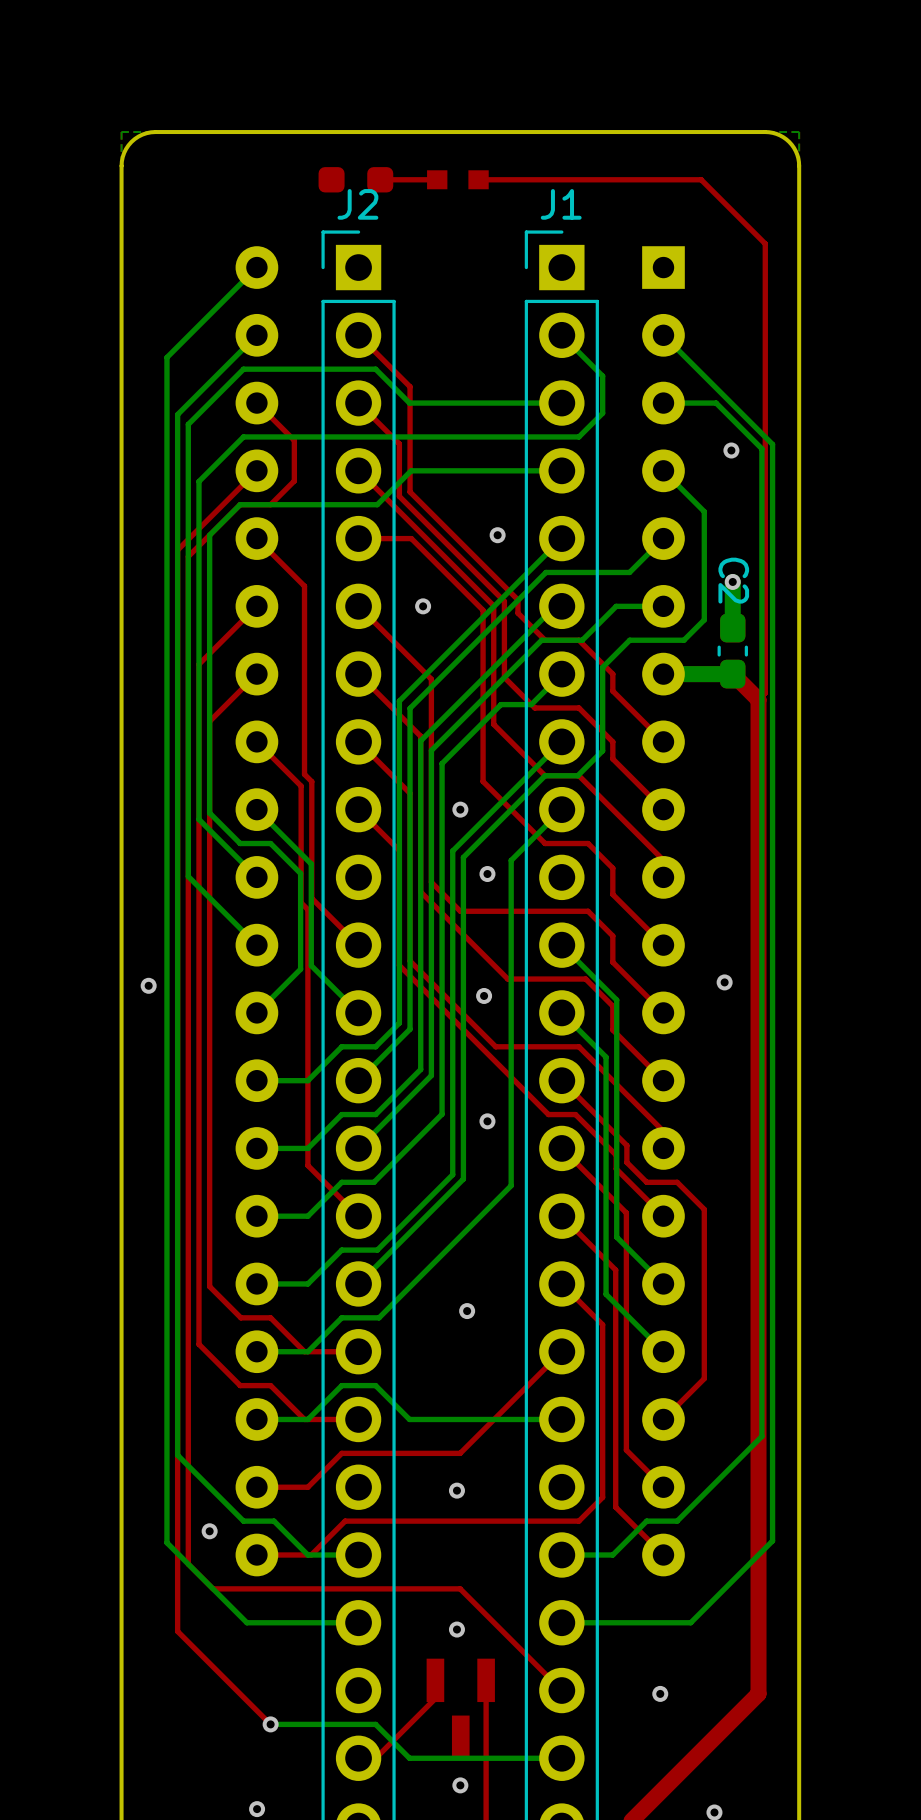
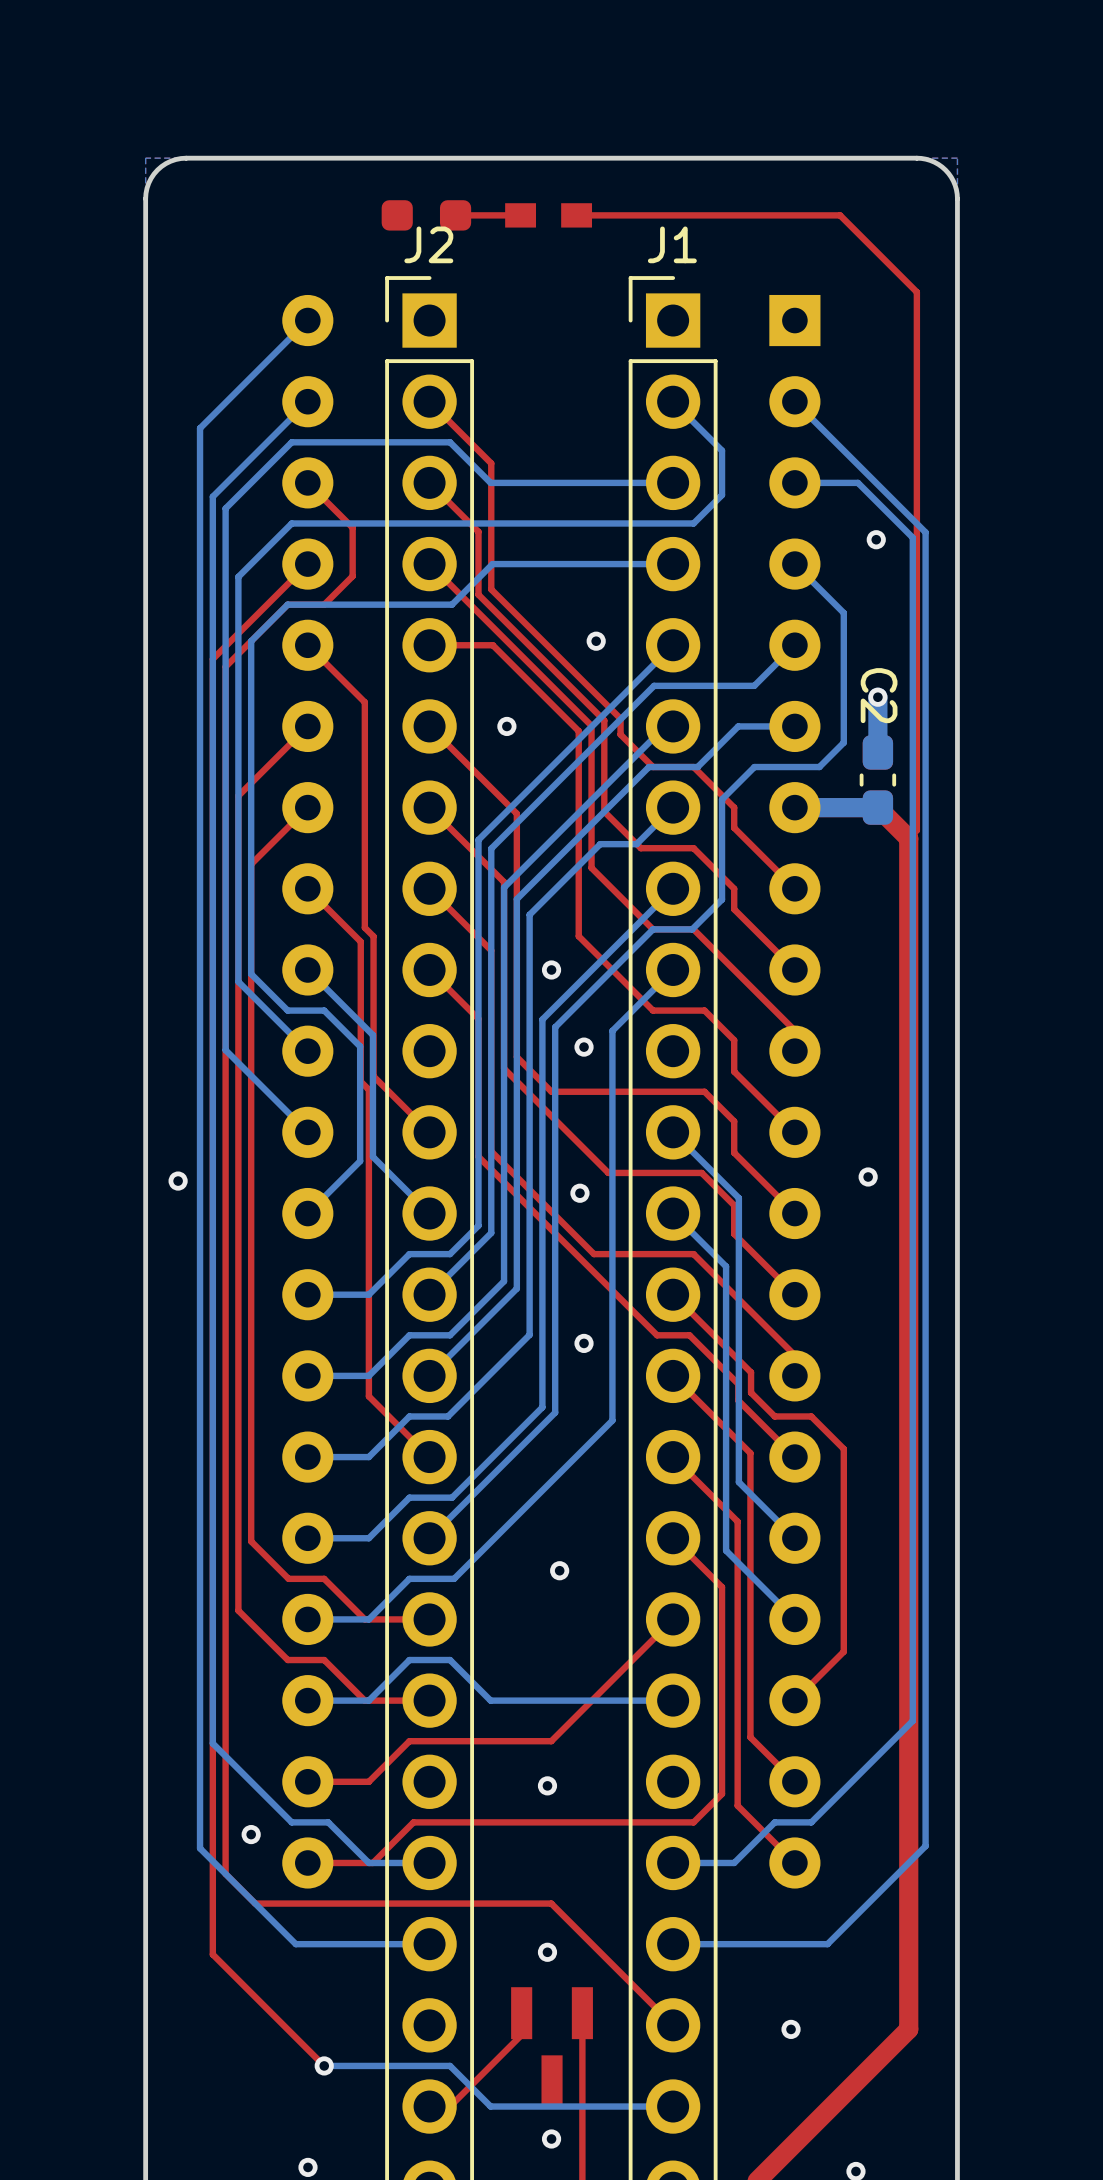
part footprint: [427, 170, 489, 190] -> [505, 203, 593, 228]

